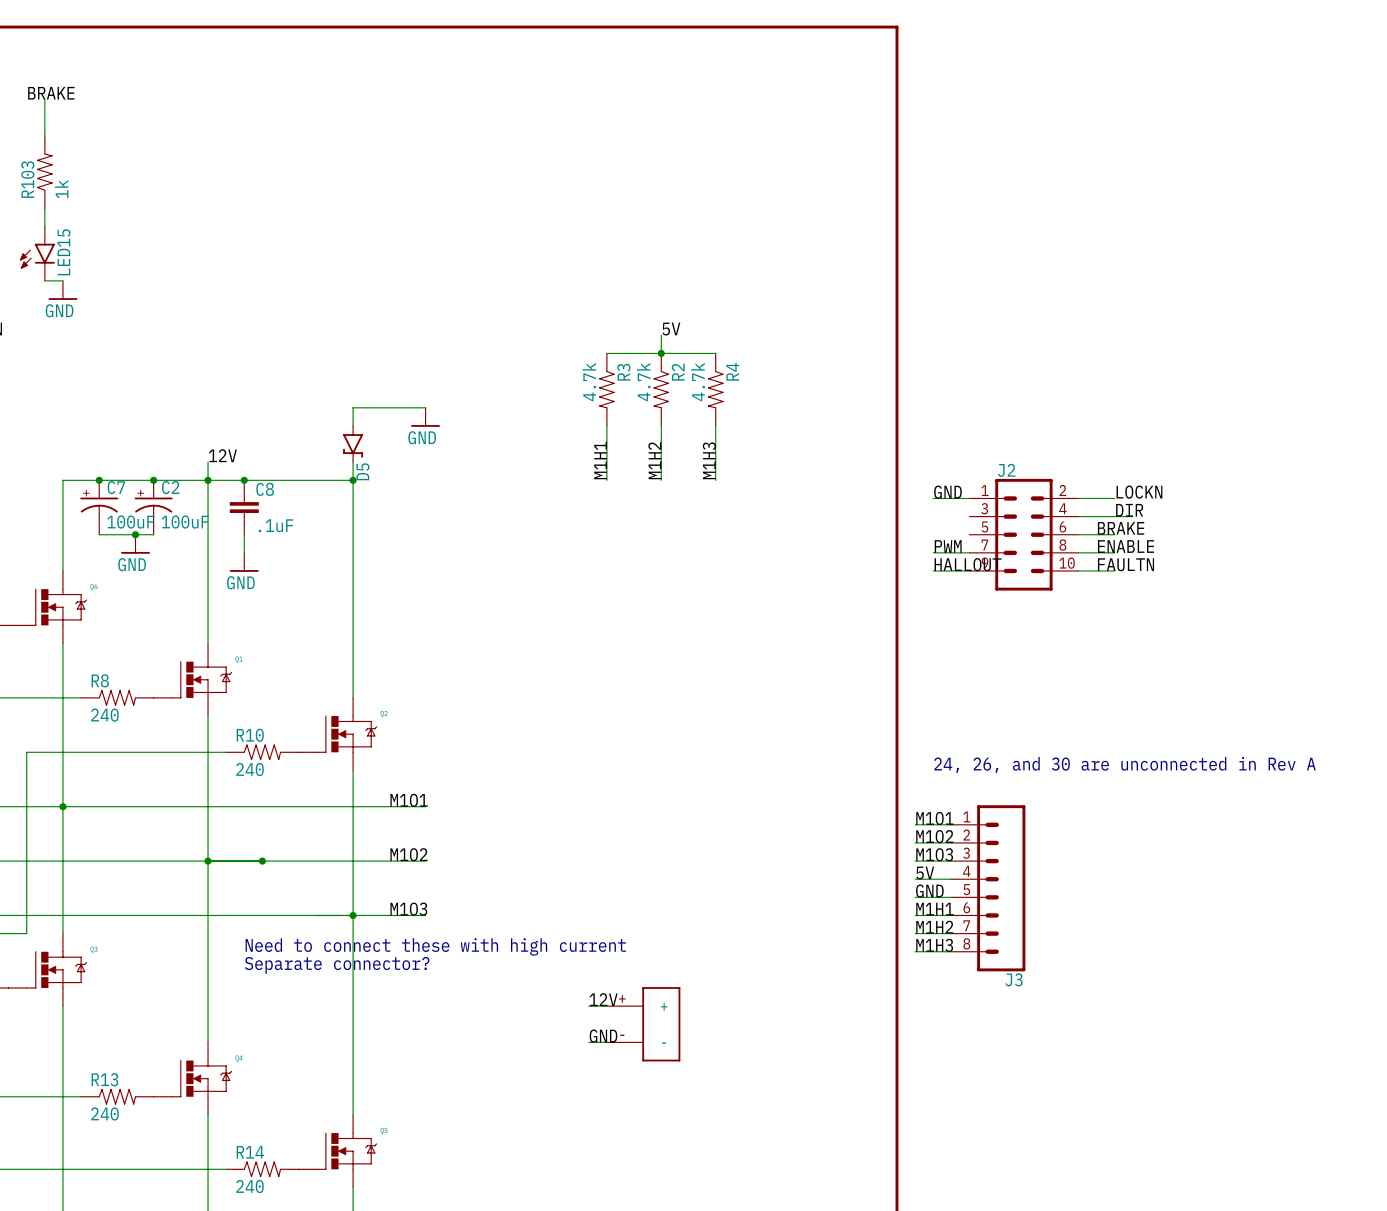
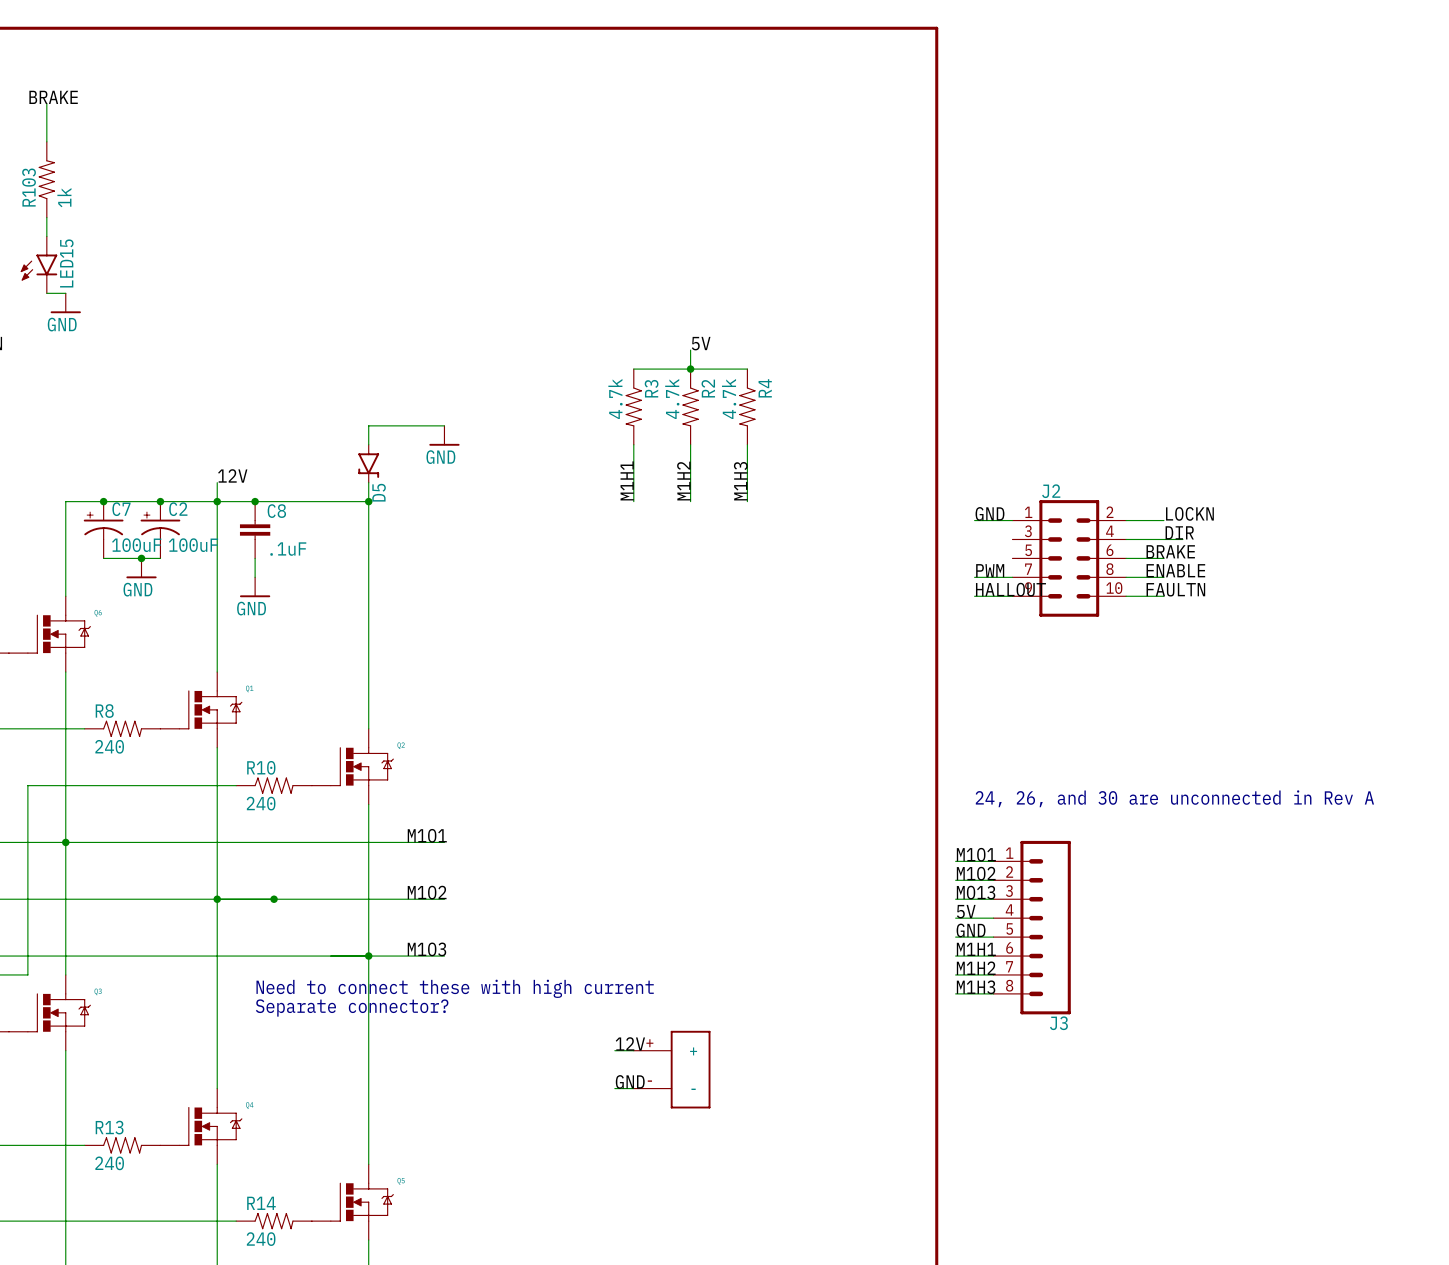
label: M1O3 (934, 854) -> MO13 (976, 892)

